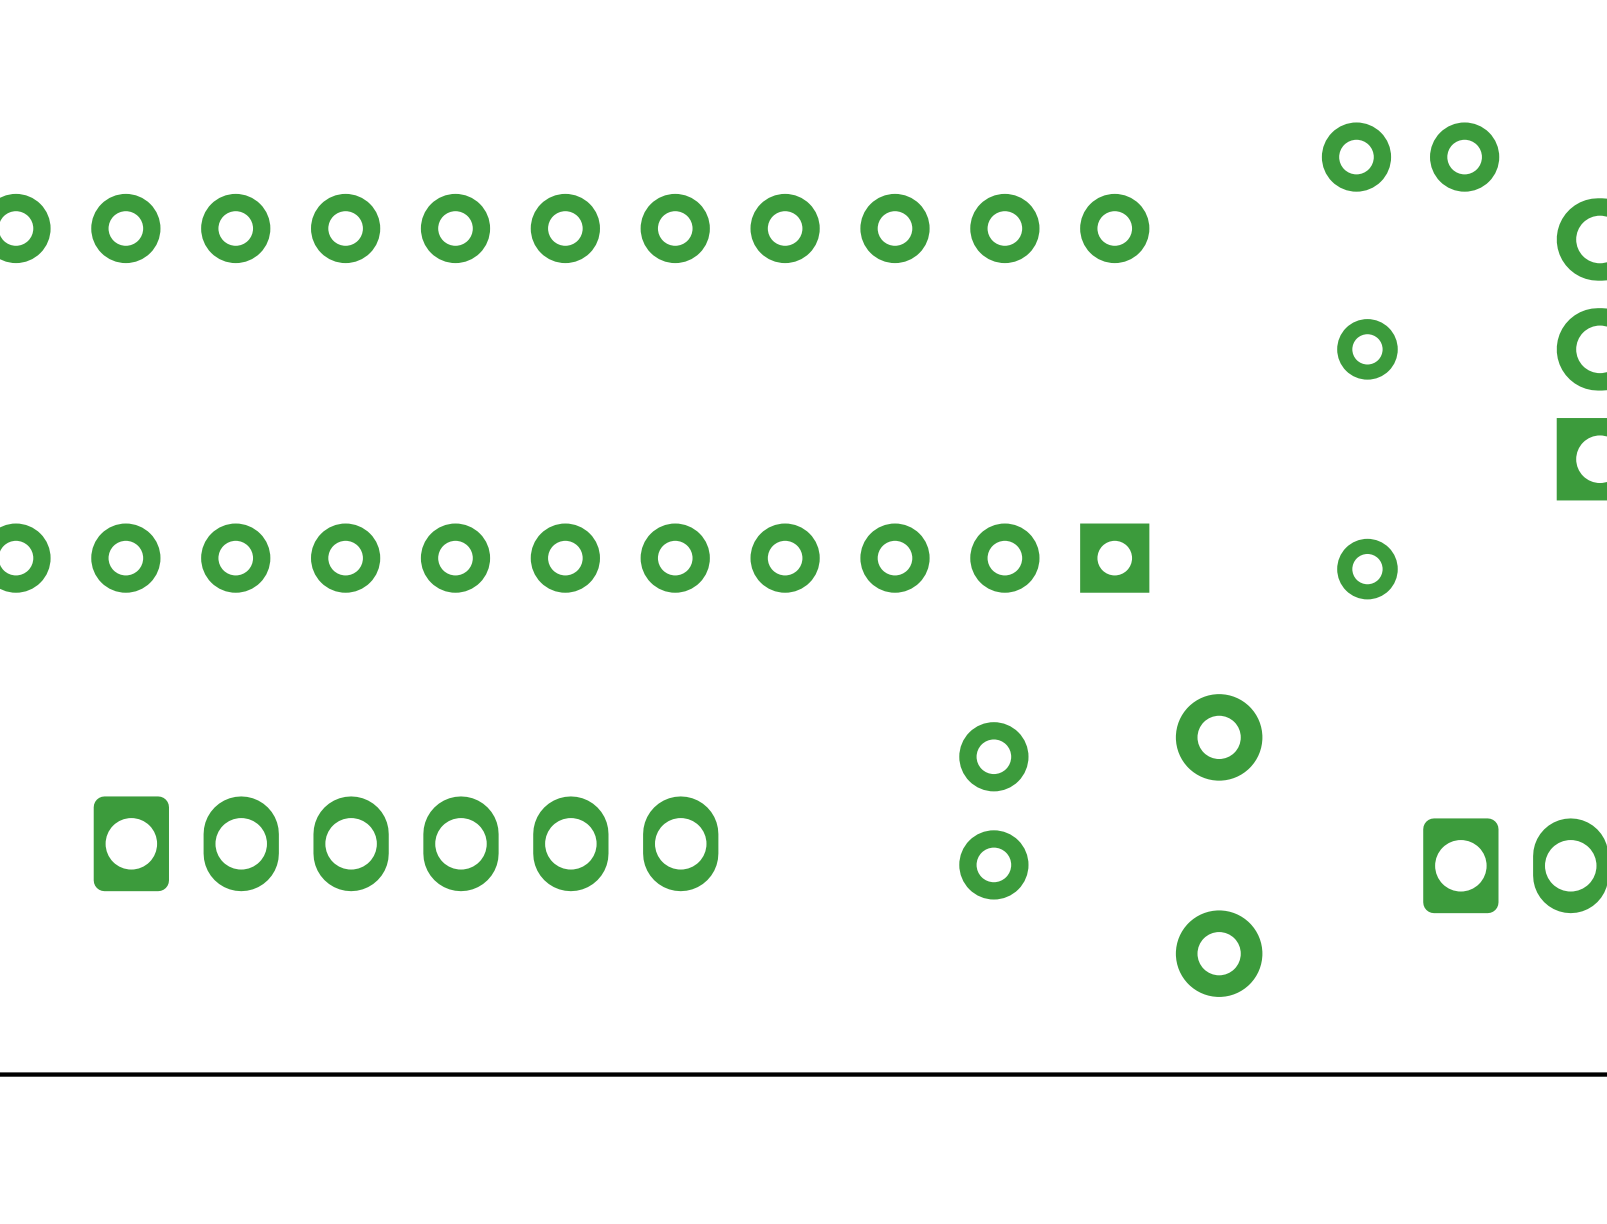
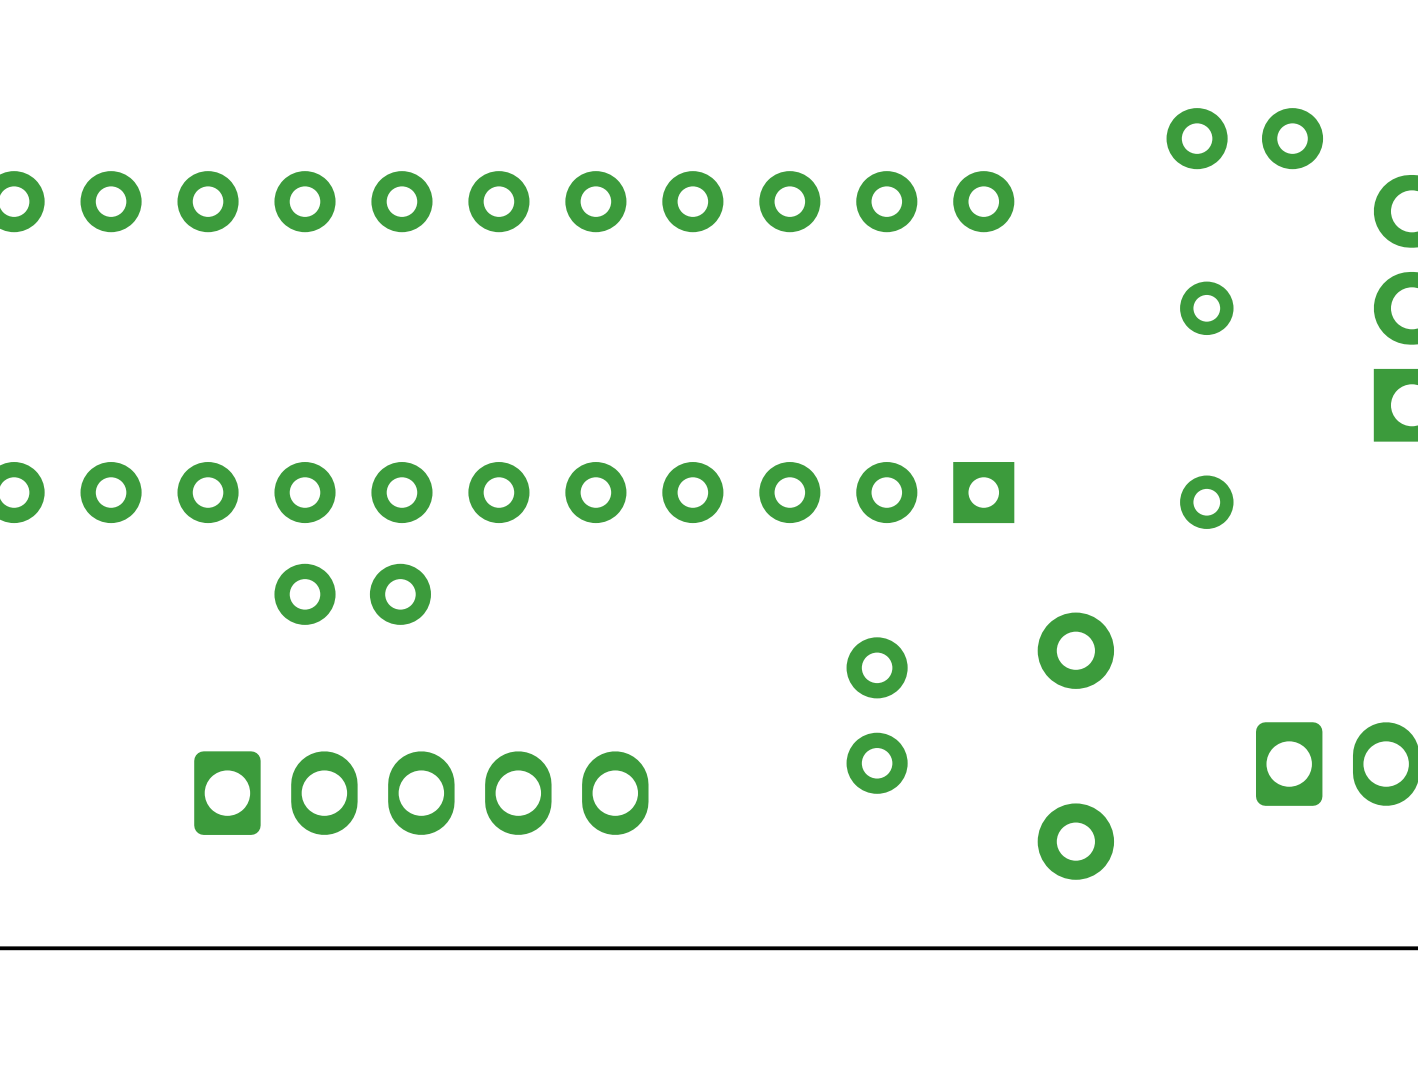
part: none -> (352, 594)
part: (406, 843) -> none
part: none -> (421, 793)

